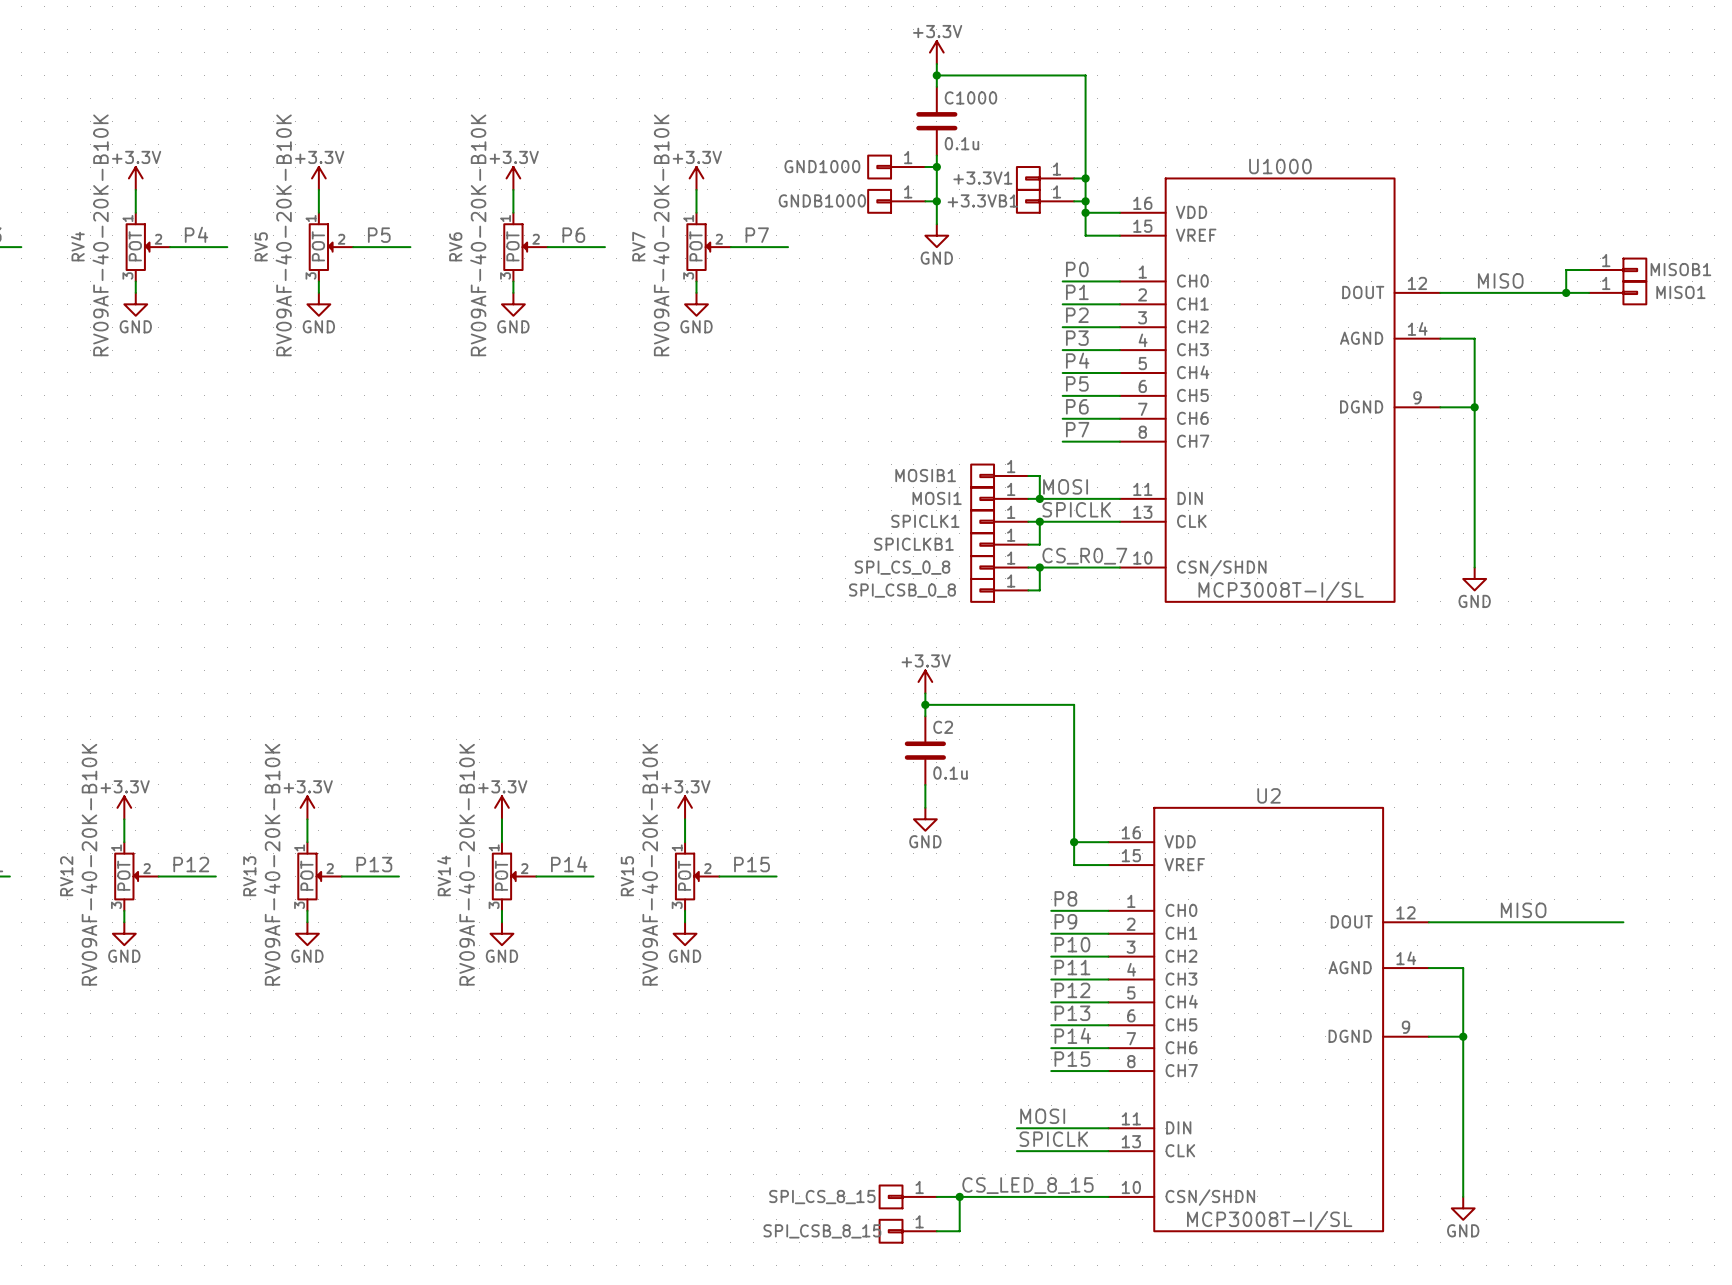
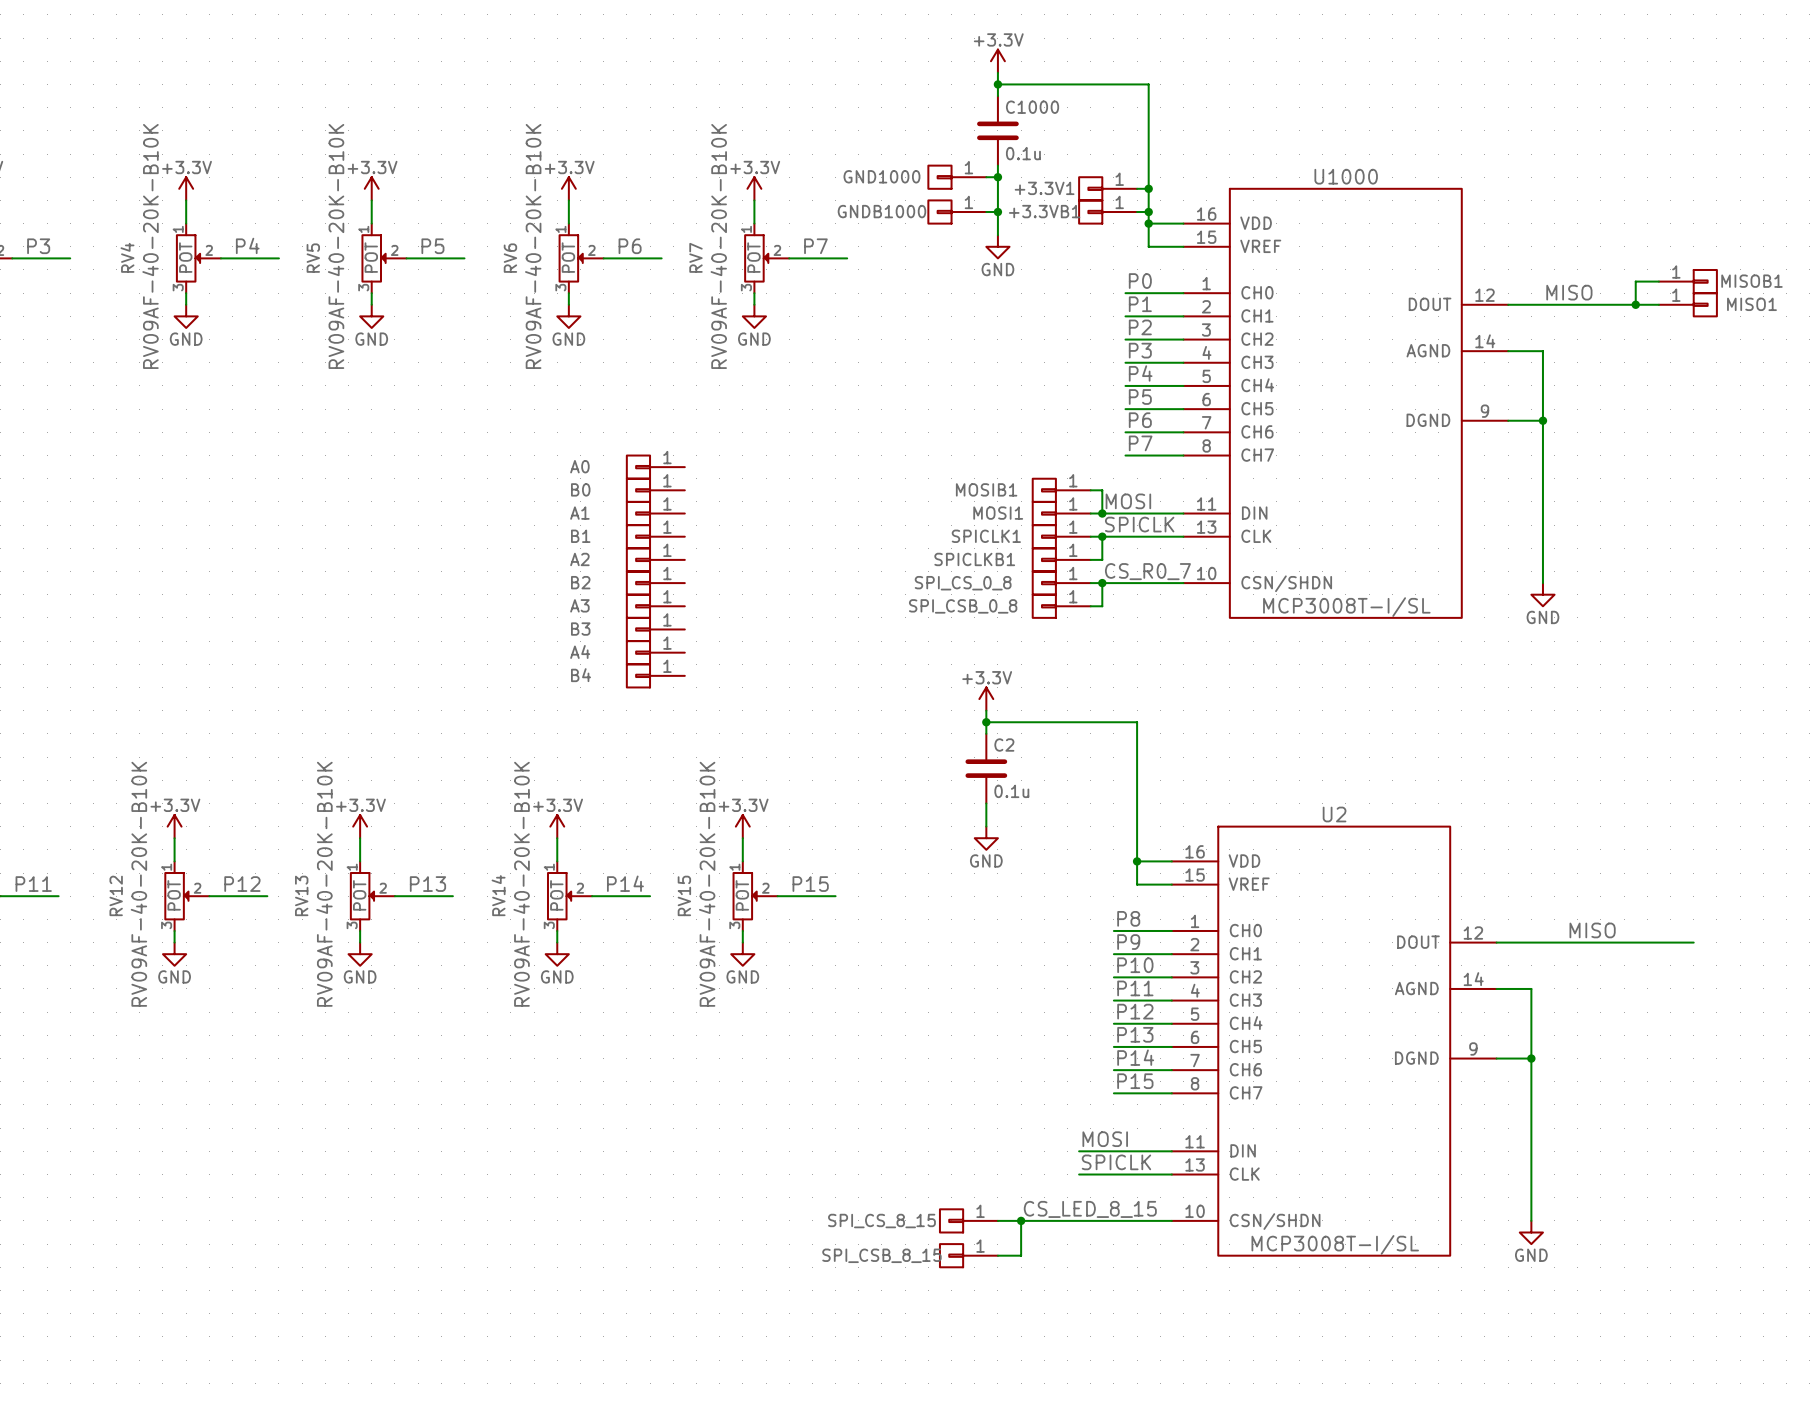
A0: none -> (655, 467)
B0: none -> (655, 490)
A1: none -> (655, 513)
B1: none -> (655, 536)
A2: none -> (655, 559)
B2: none -> (655, 583)
A3: none -> (655, 606)
B3: none -> (655, 629)
A4: none -> (655, 652)
B4: none -> (655, 675)

